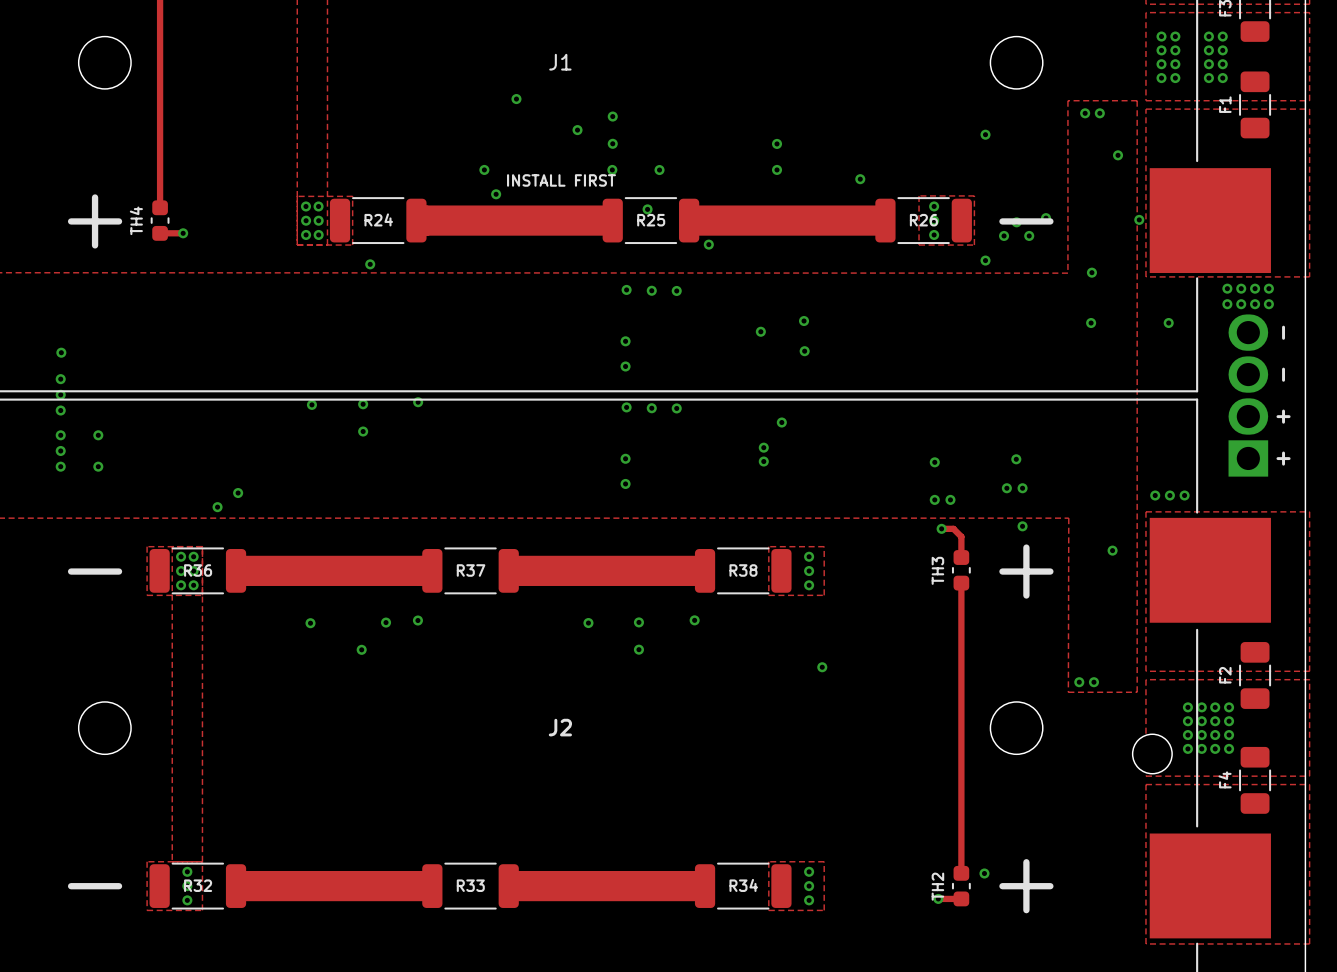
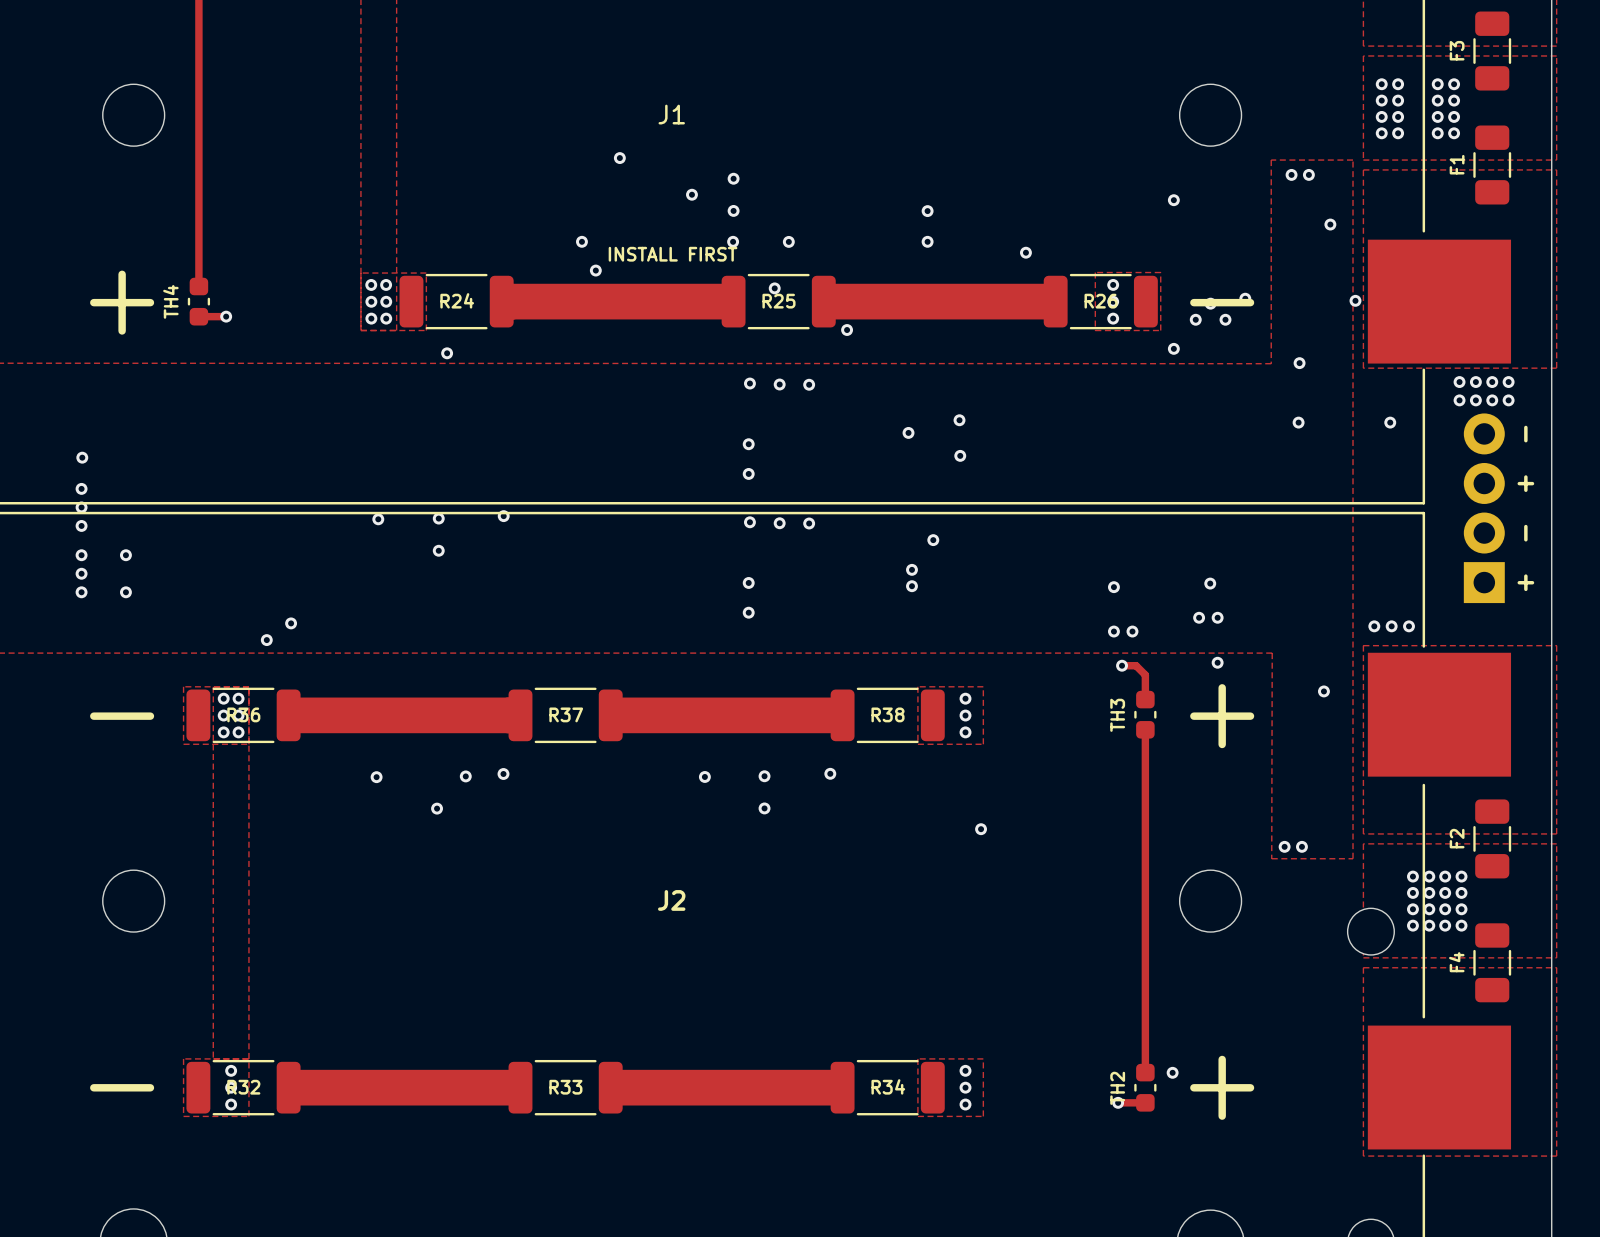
part footprint: [1228, 314, 1269, 477] -> [1463, 413, 1505, 604]
text: - (1283, 374) -> + (1525, 483)
text: + (1283, 416) -> - (1525, 533)

